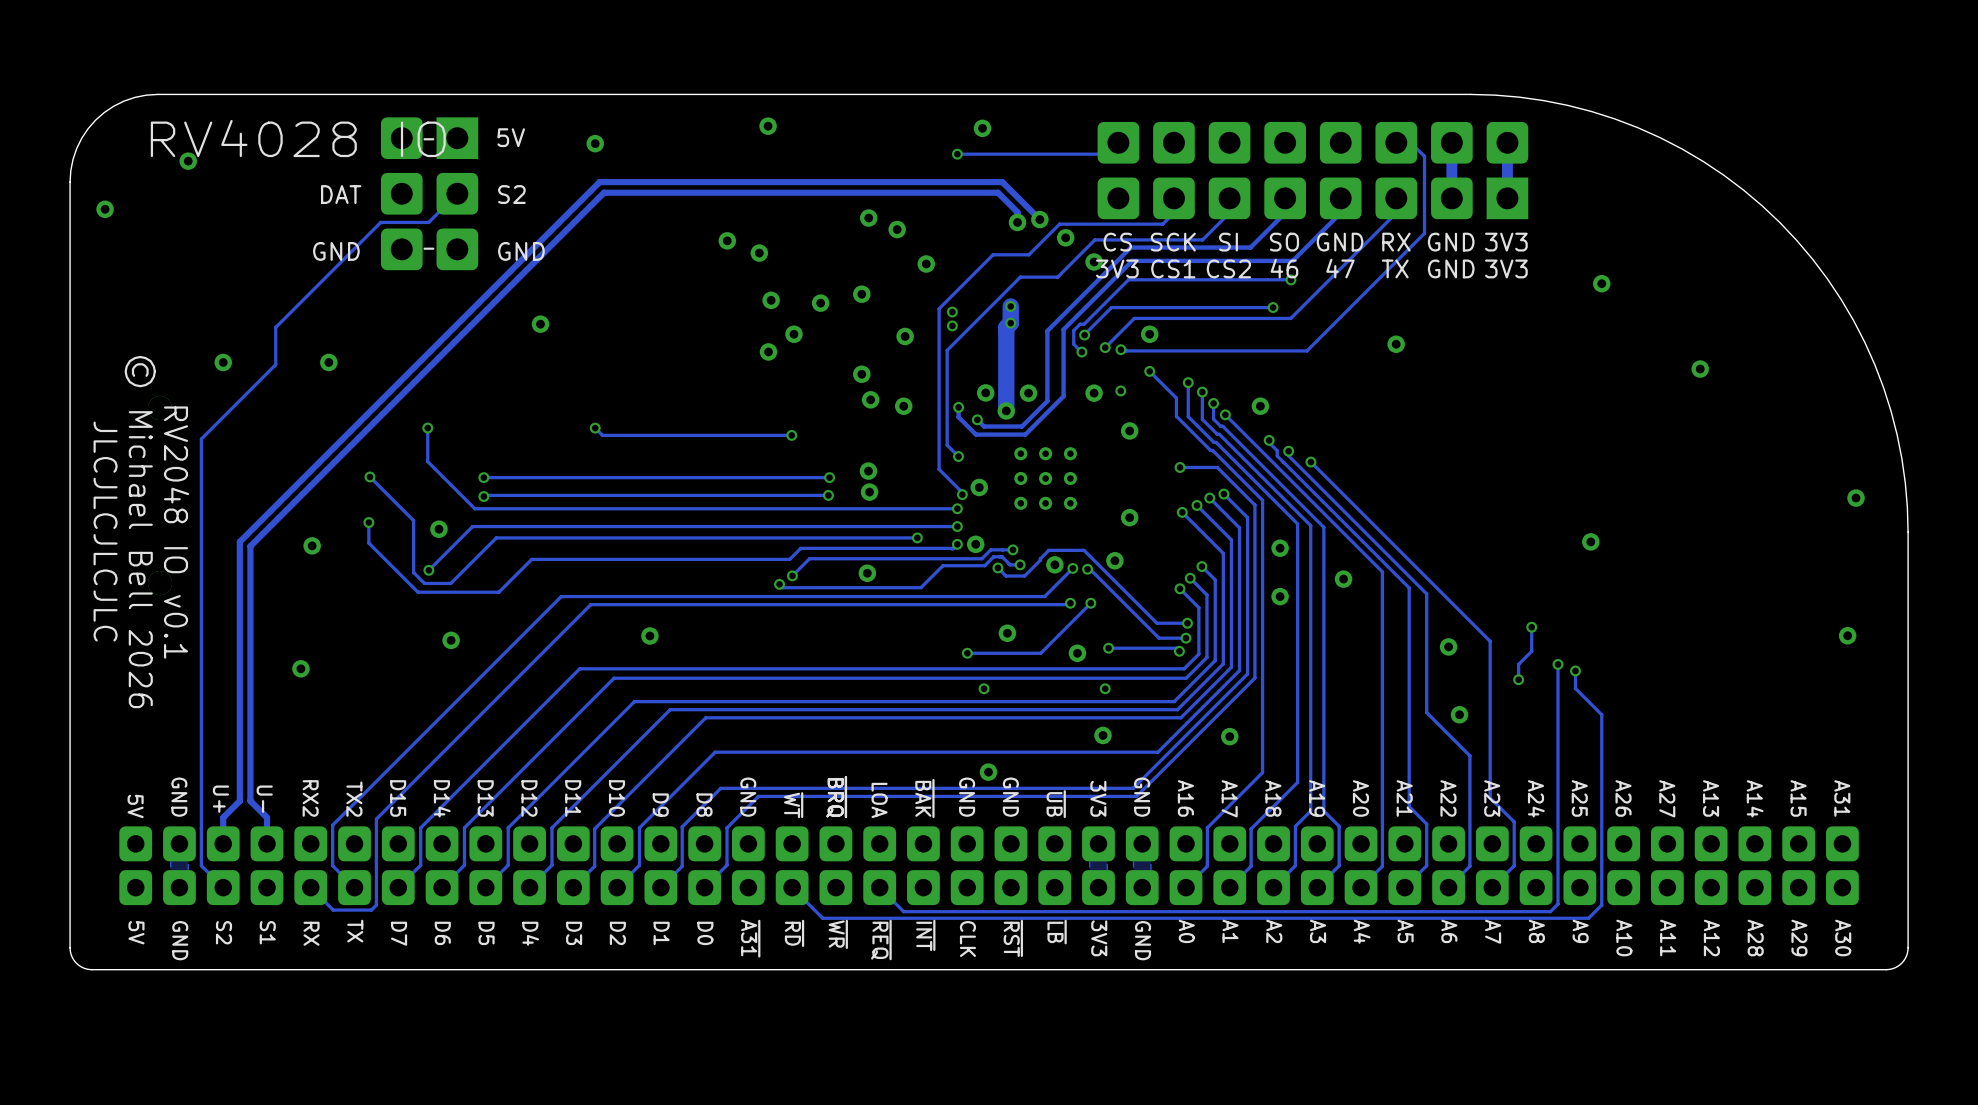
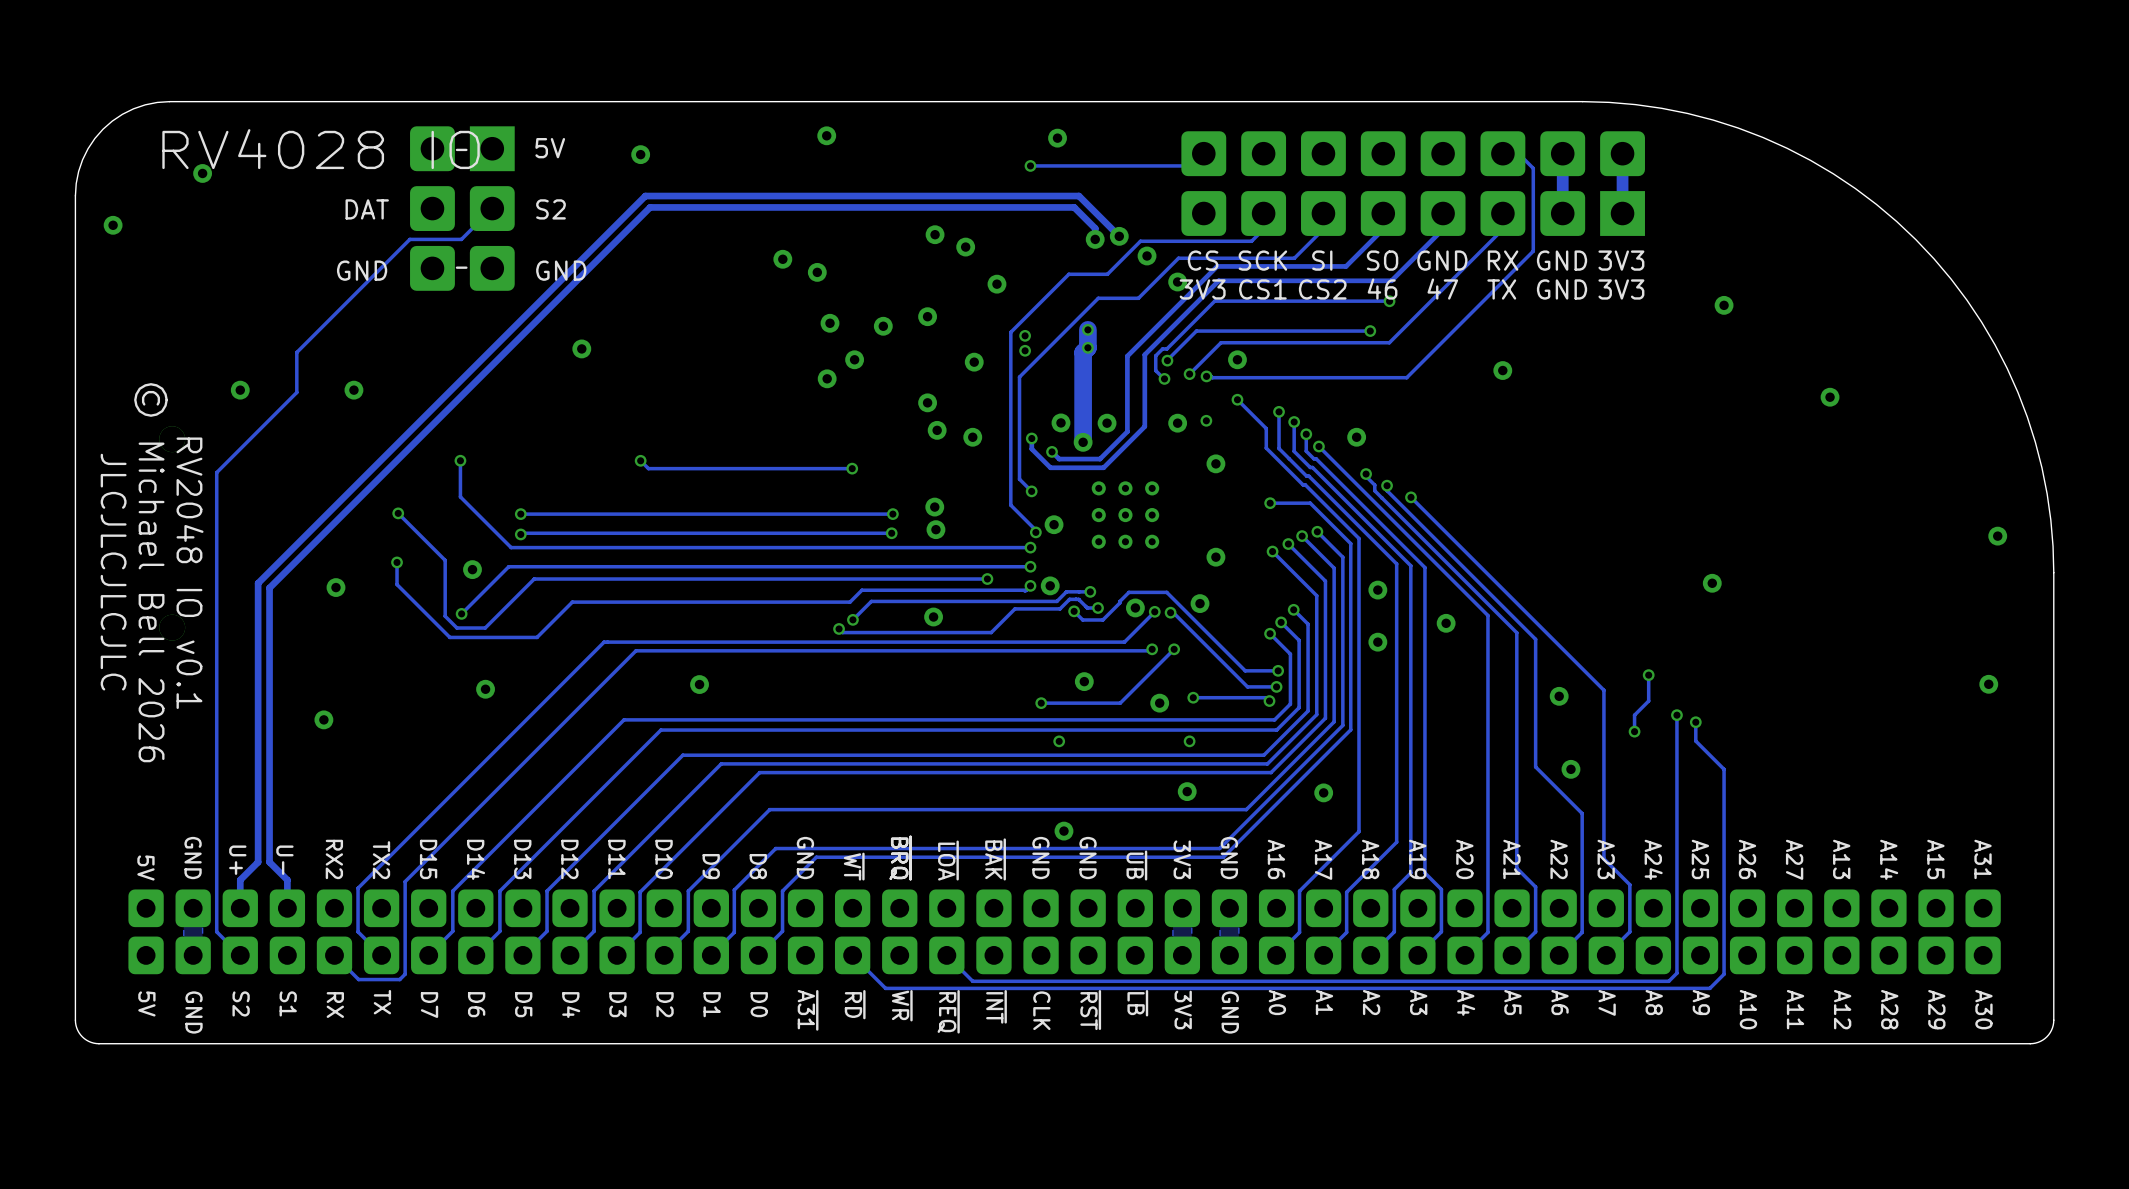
part text: LOA (879, 800) -> ~{LOA} (948, 860)

